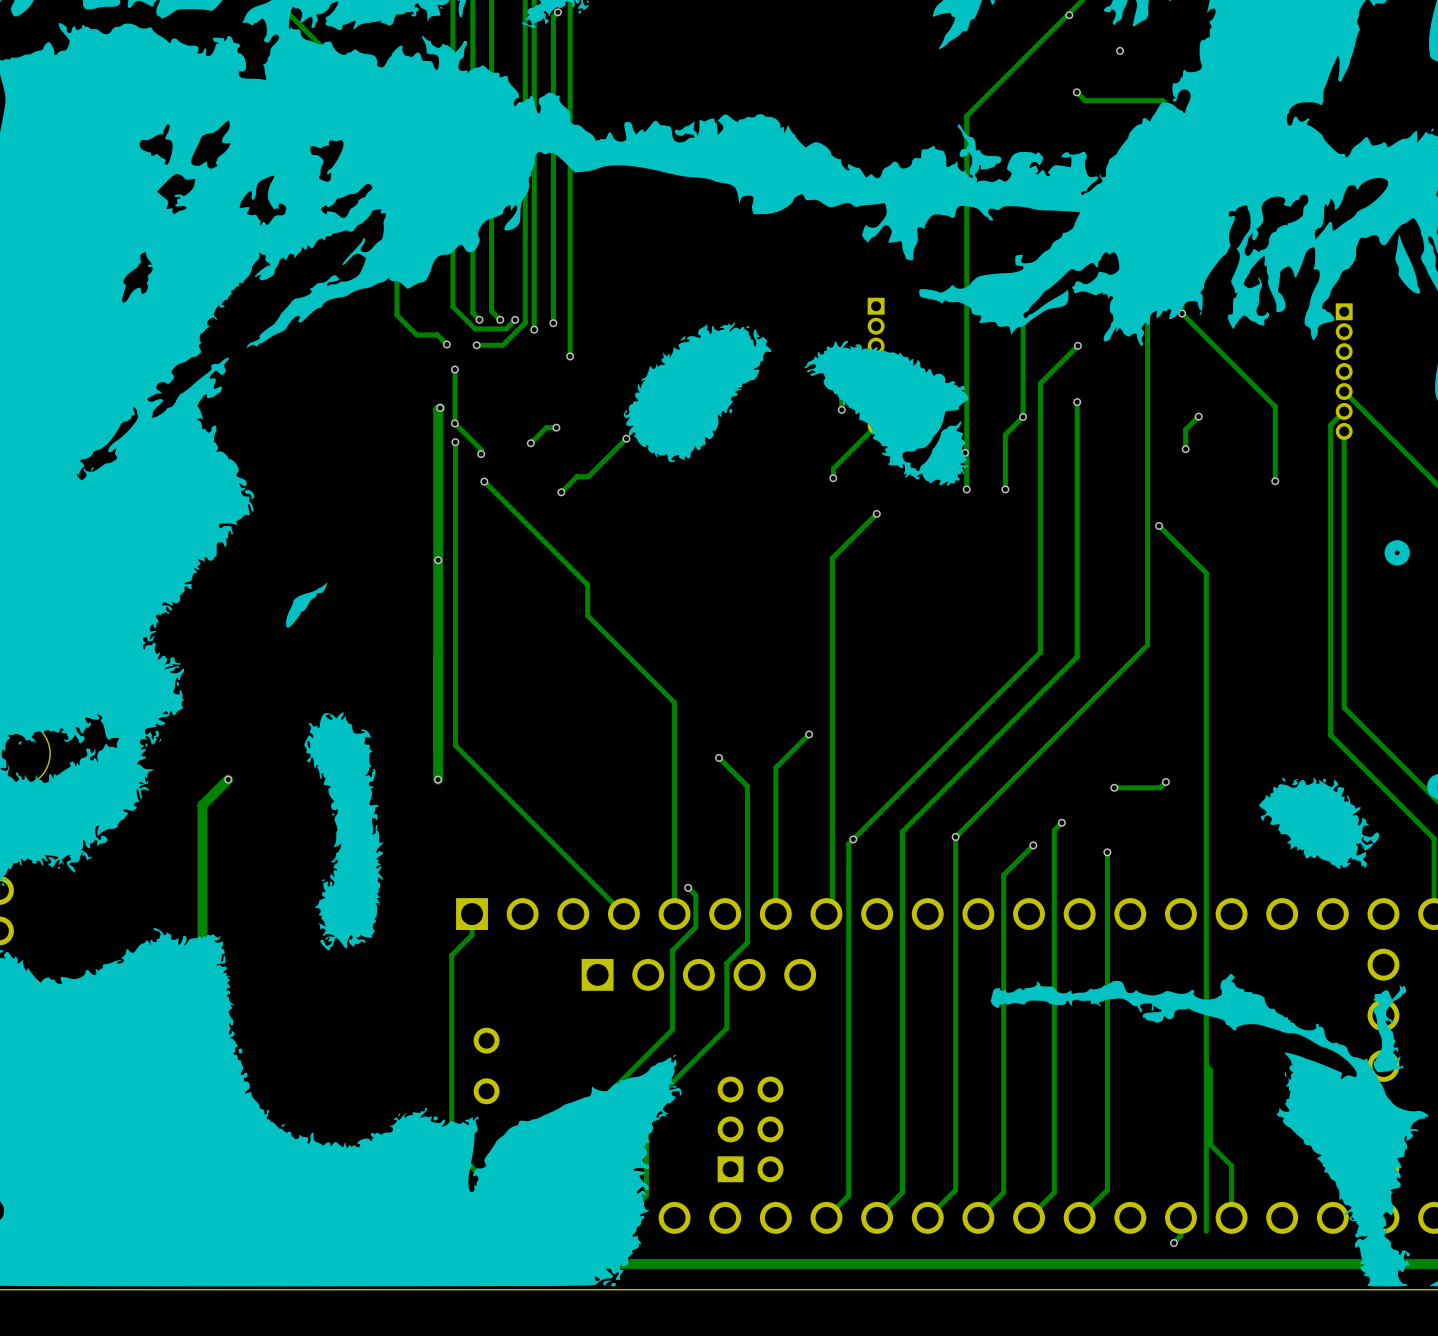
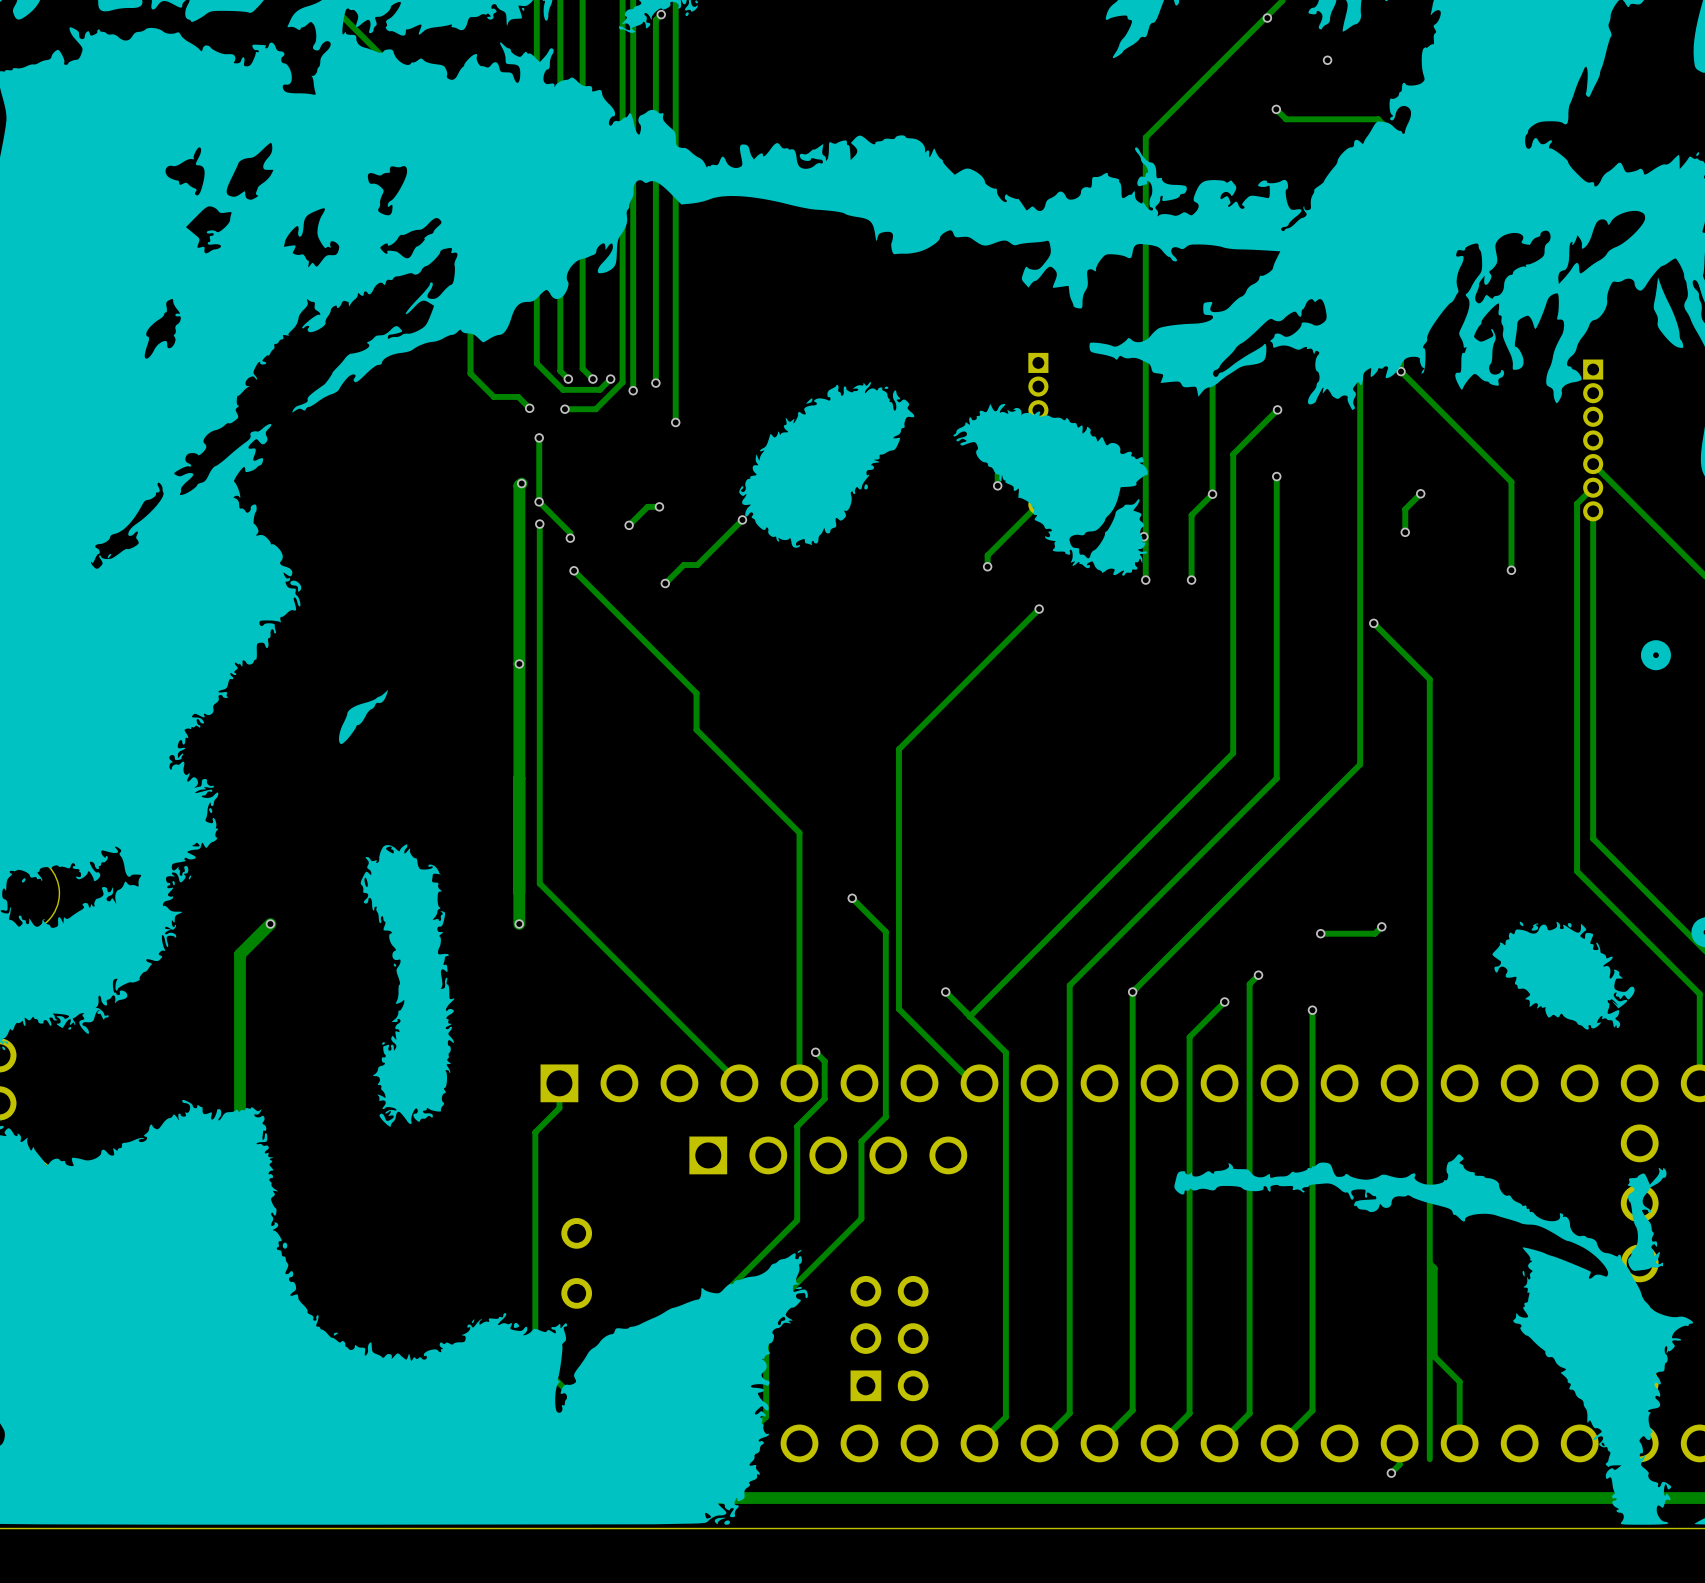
track: (832, 558) (832, 902) (821, 914) -> (986, 661) (898, 749) (898, 1009) (973, 1083)
track: (1040, 635) (1040, 652) (848, 843) (848, 888) -> (1233, 753) (969, 1016)
track: (809, 734) (775, 767) (775, 914) -> none
via: (809, 734) -> none
track: none -> (945, 992) (966, 1012)
via: none -> (945, 992)
via: (853, 839) -> none
track: none -> (966, 1012) (1005, 1052)

